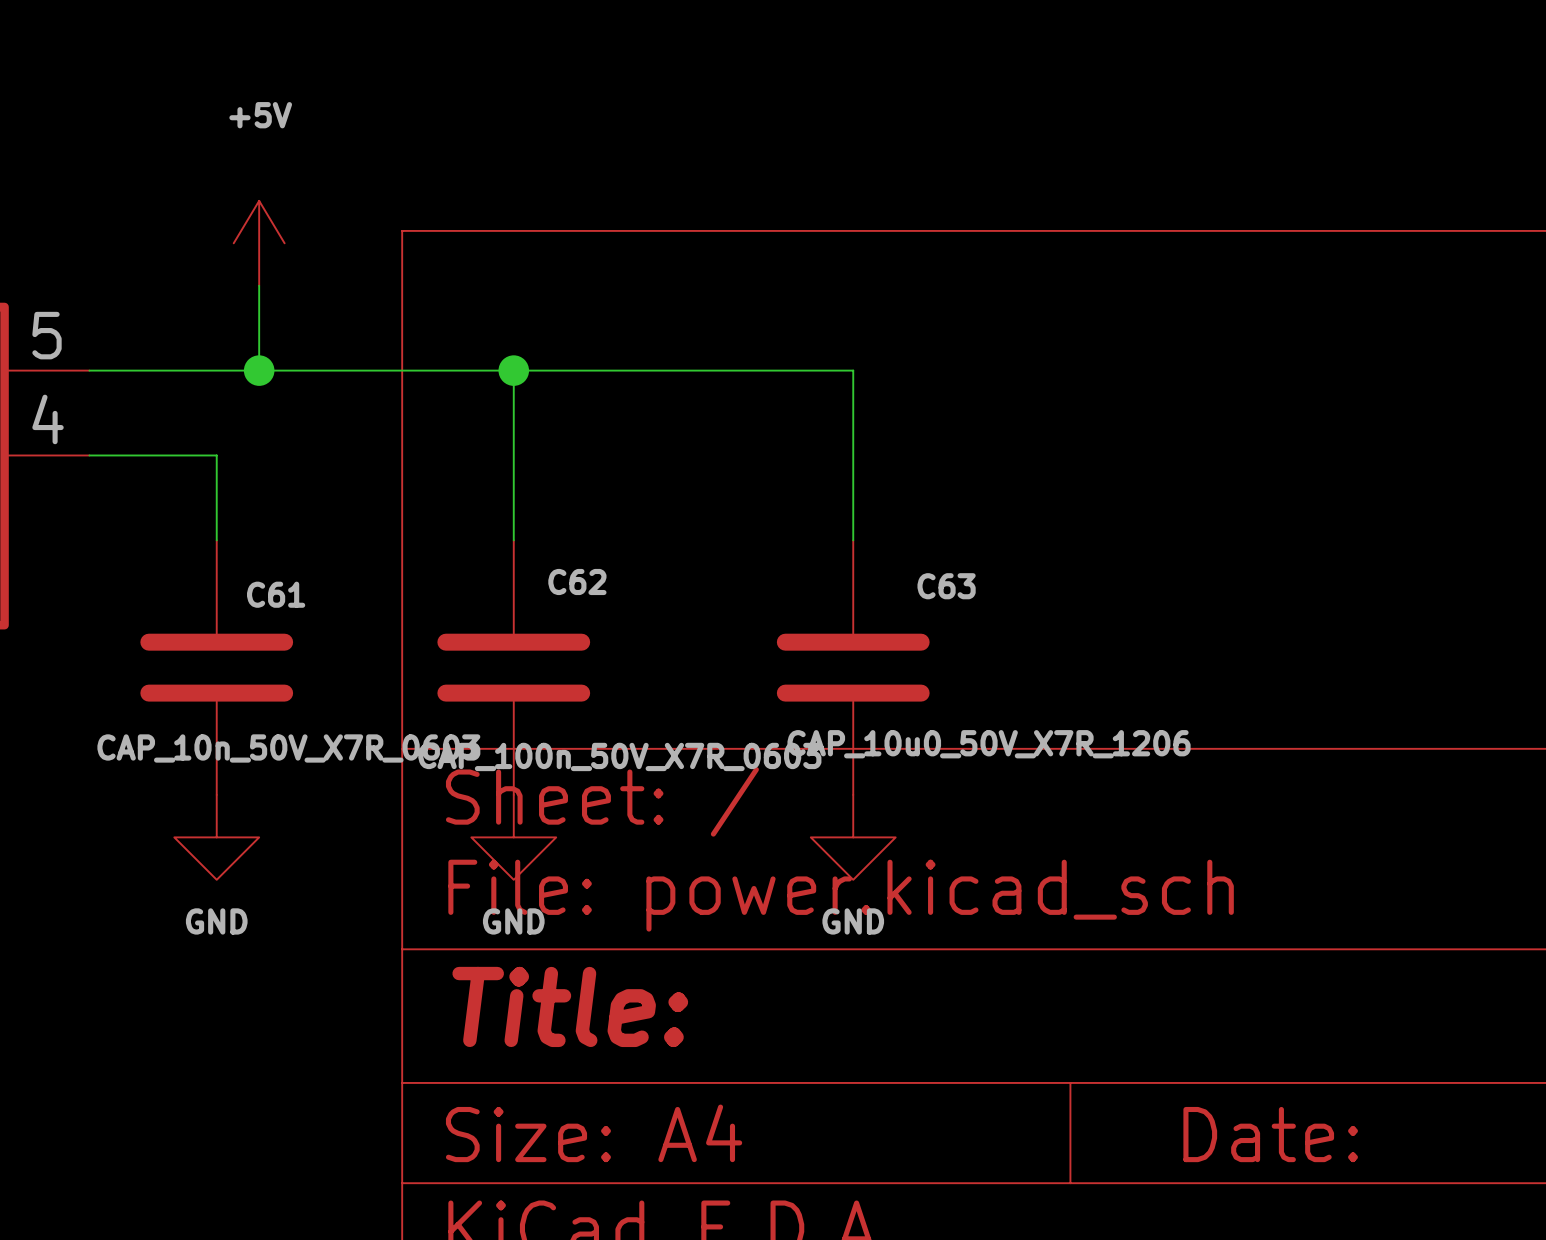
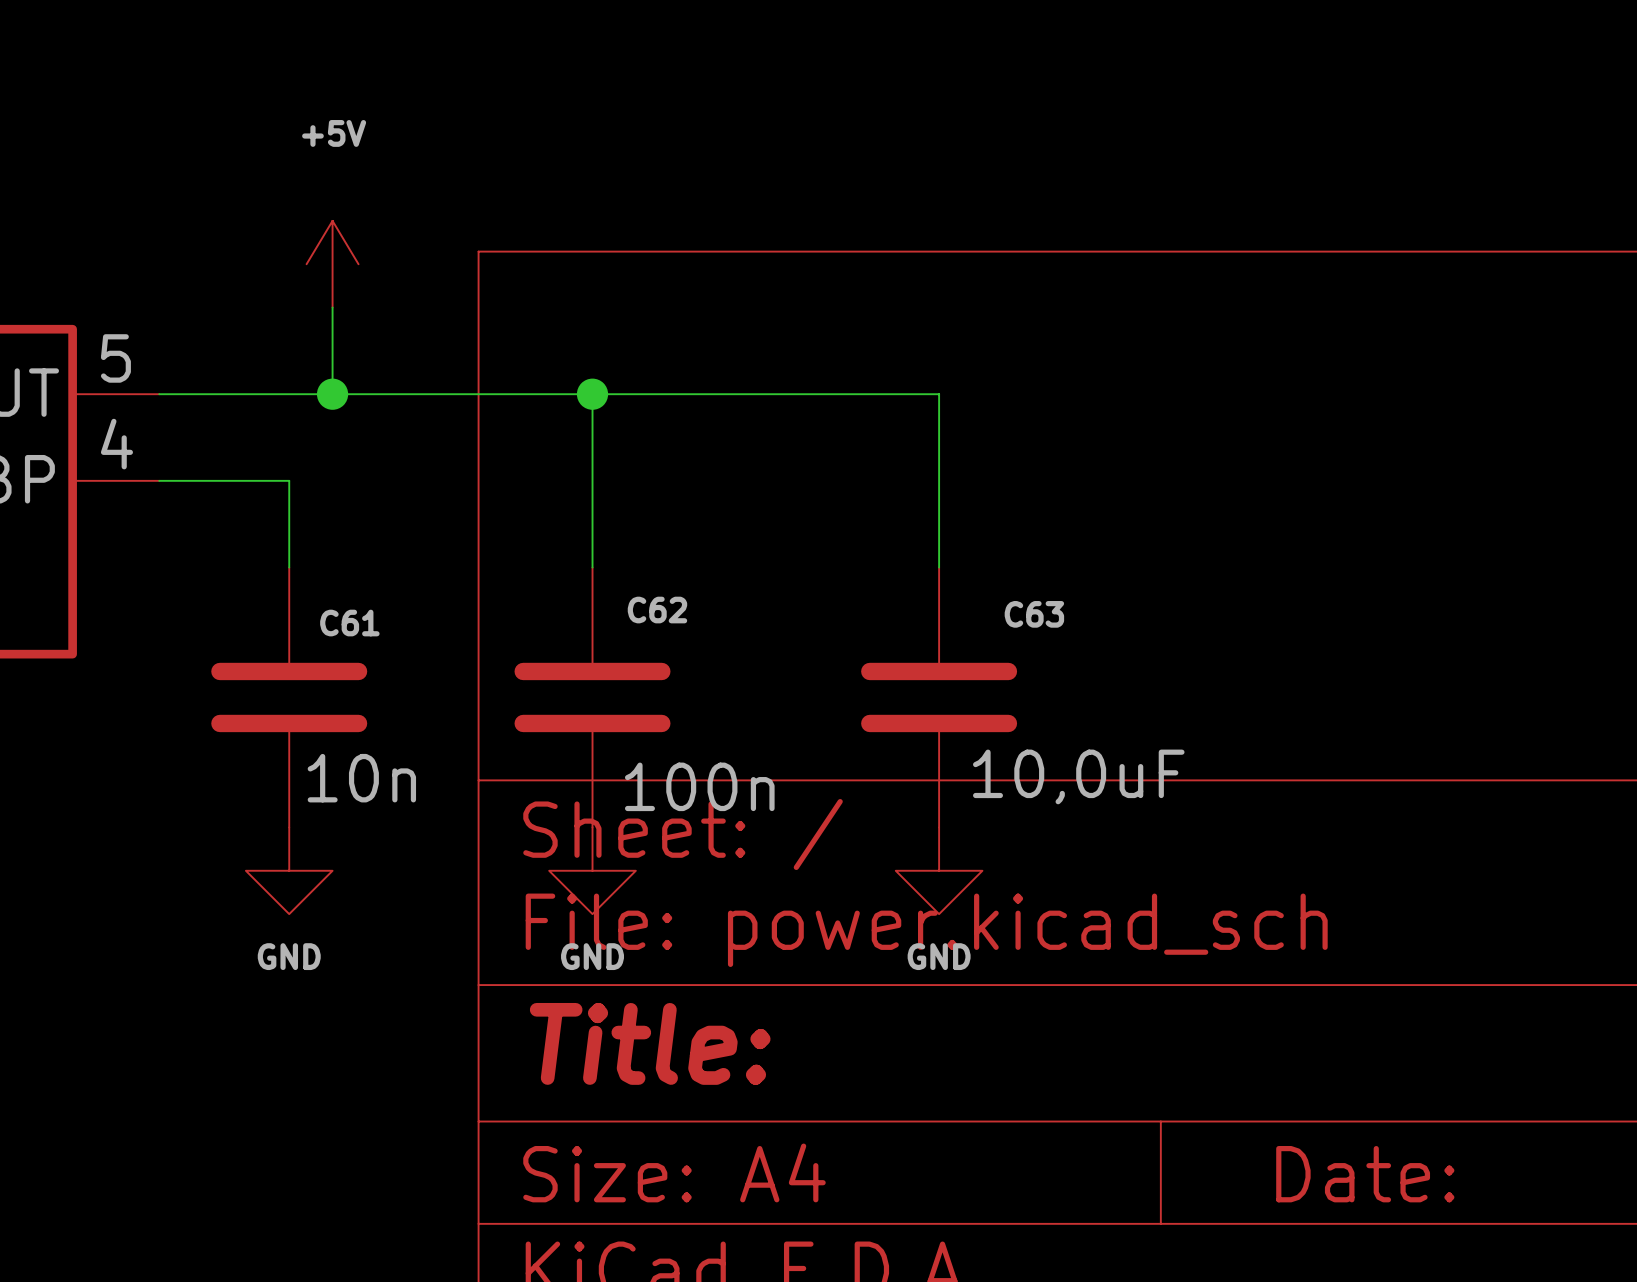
C63 value: CAP_10u0_50V_X7R_1206 (989, 744) -> 10,0uF (1078, 776)
C61 value: CAP_10n_50V_X7R_0603 (288, 748) -> 10n (361, 778)
C62 value: CAP_100n_50V_X7R_0603 (619, 756) -> 100n (699, 786)

